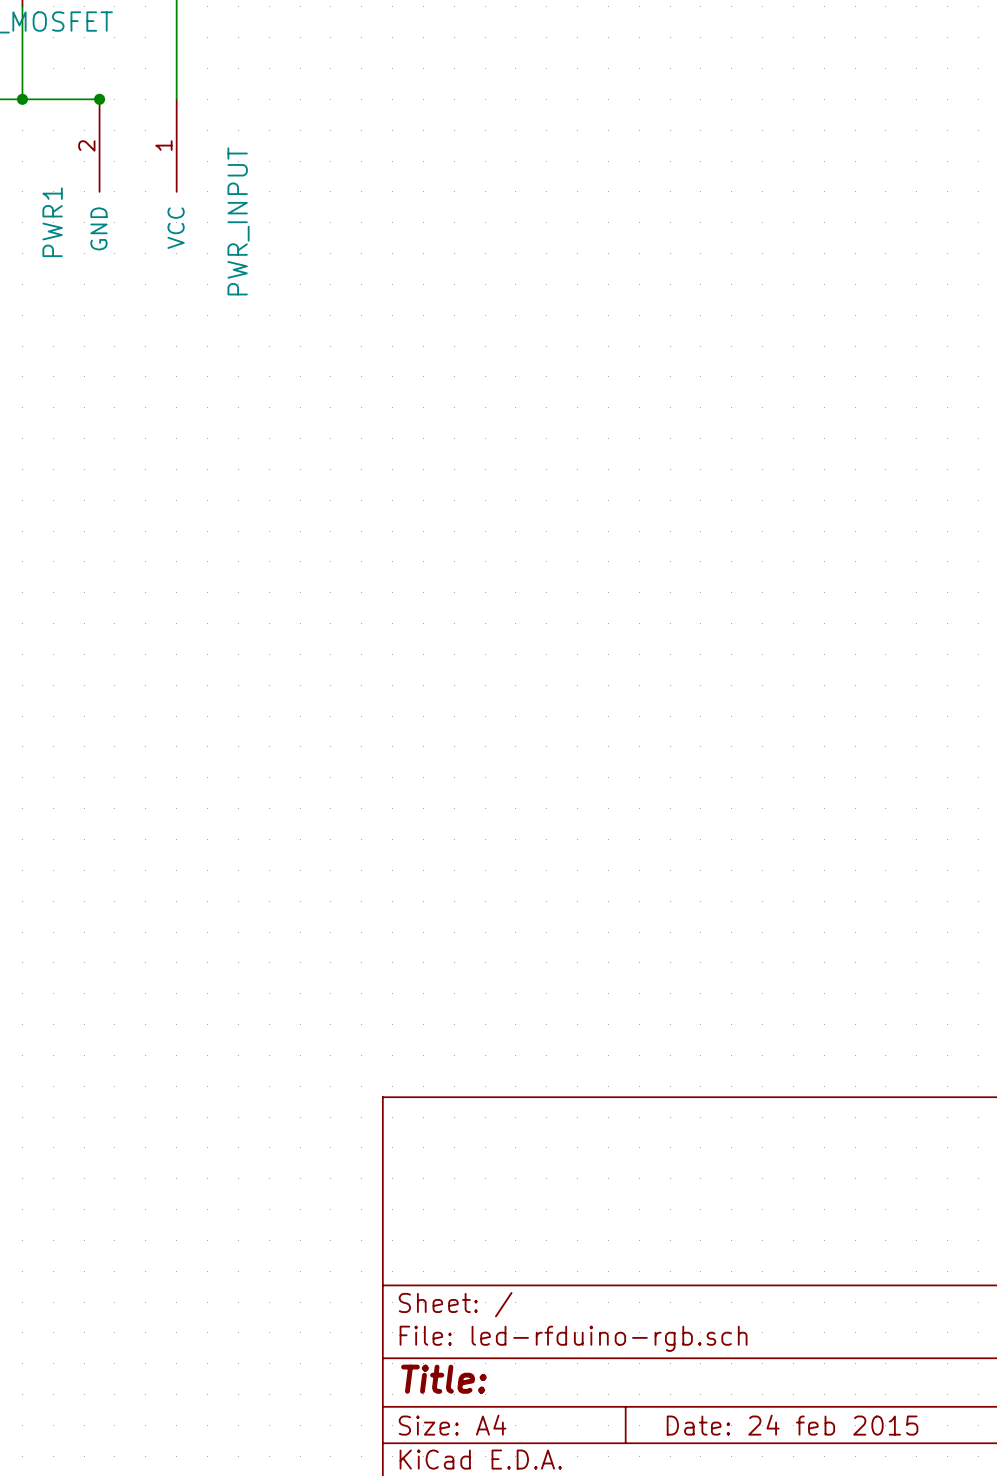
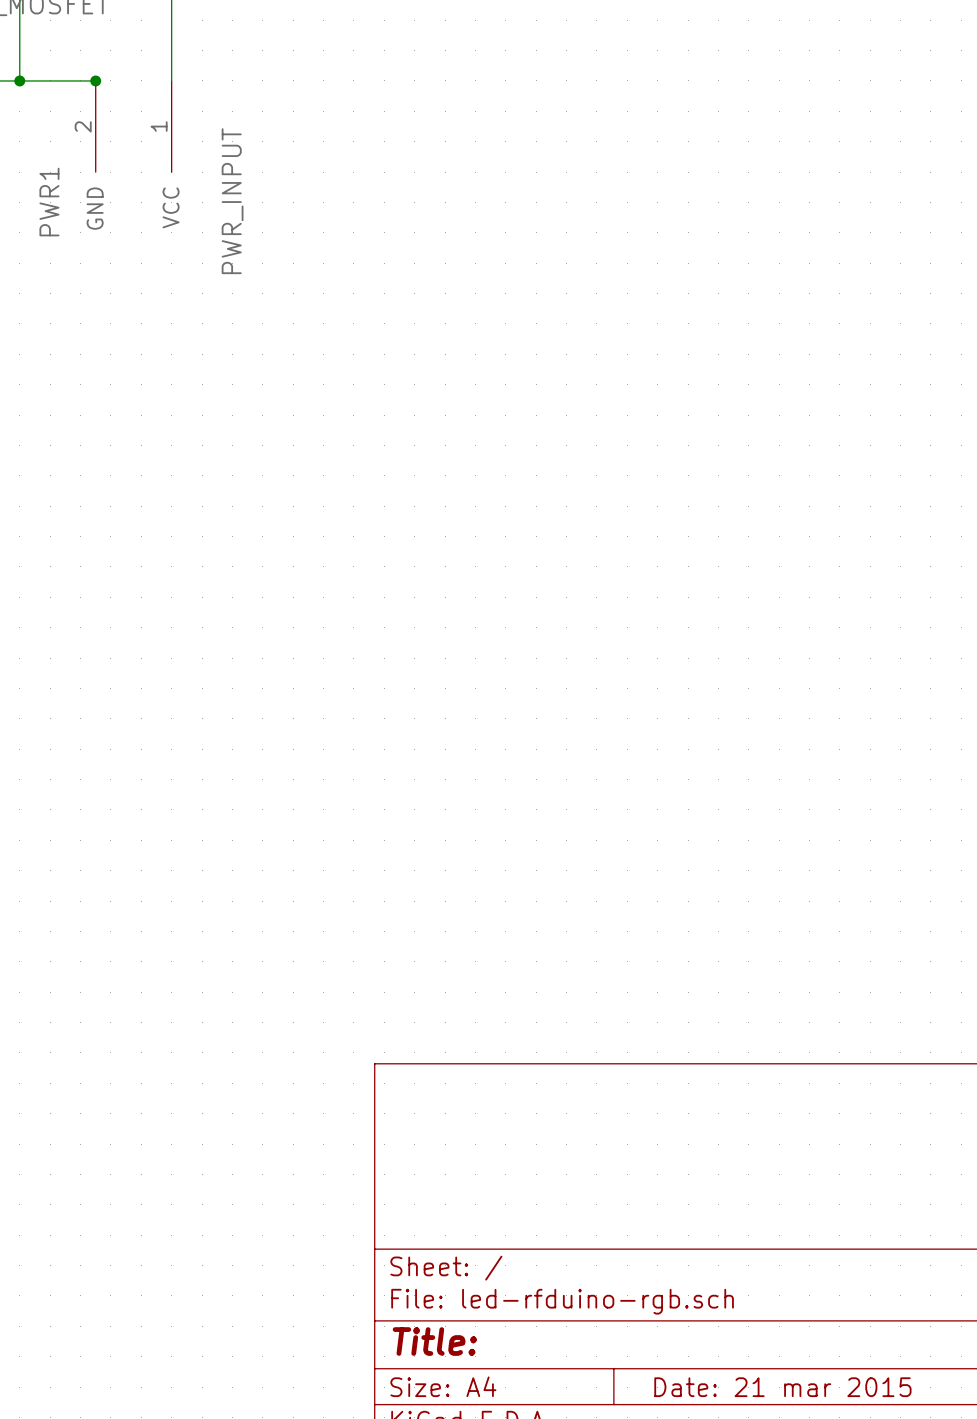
title block: Date: 24 feb 2015 (792, 1425) -> Date: 21 mar 2015 (782, 1387)

